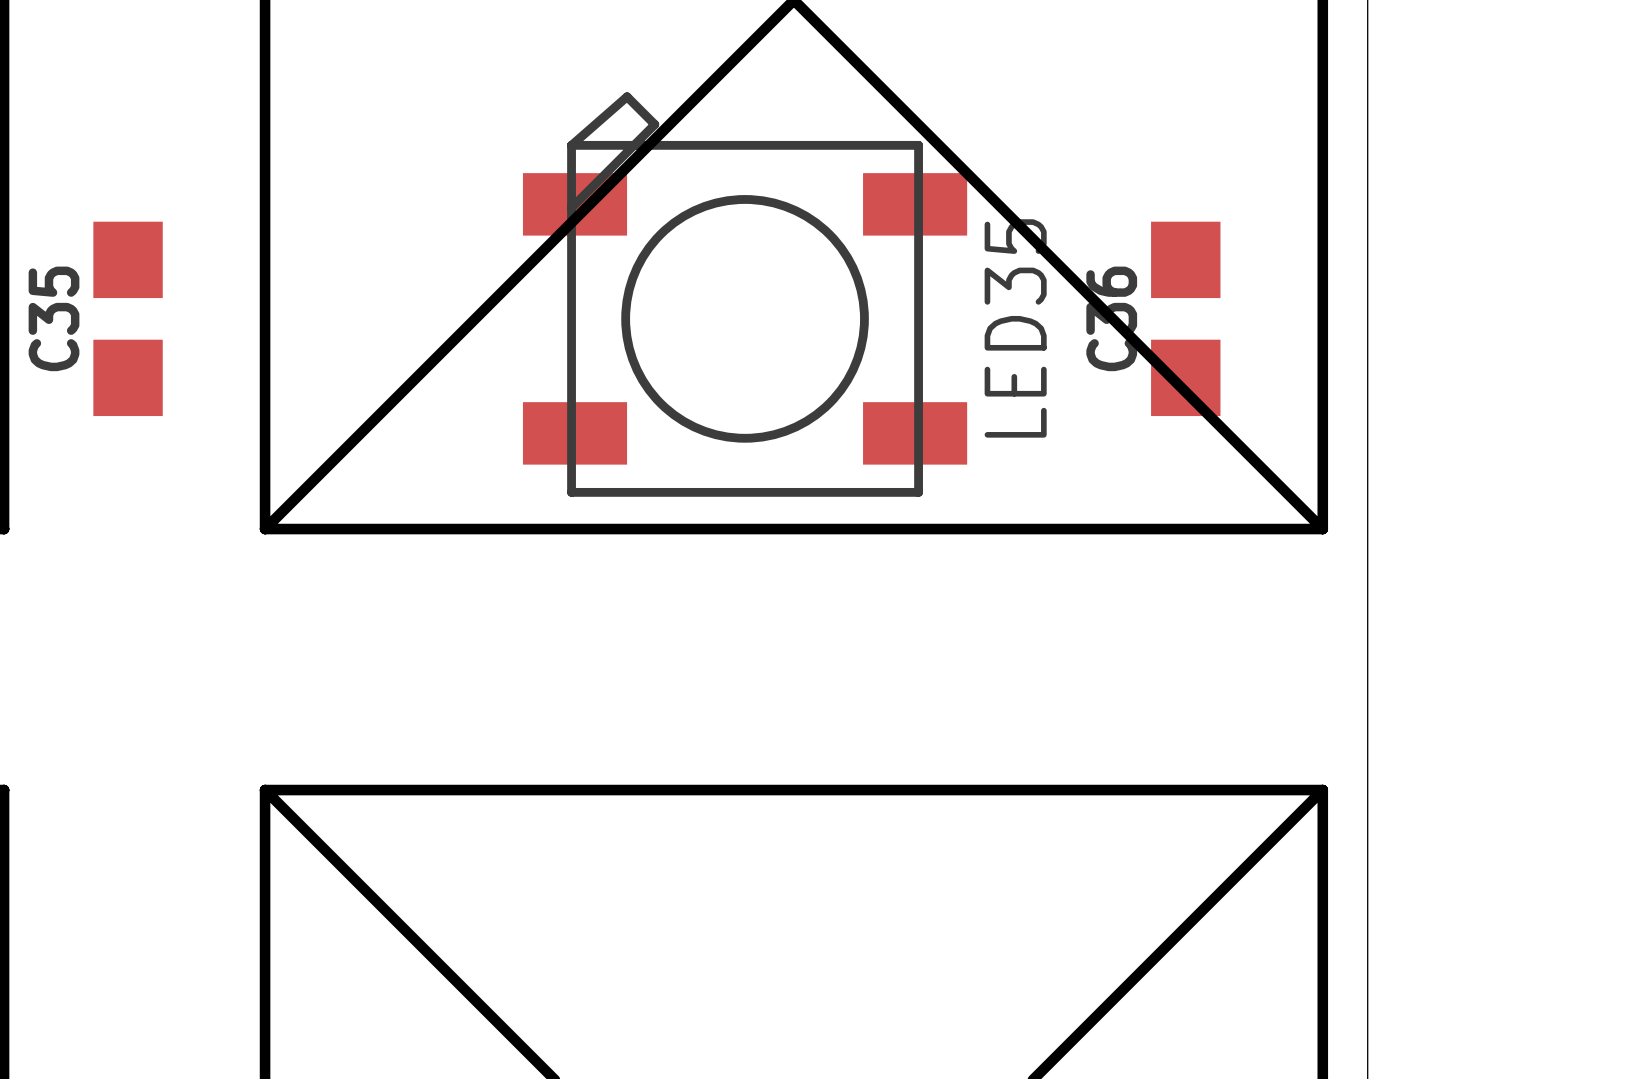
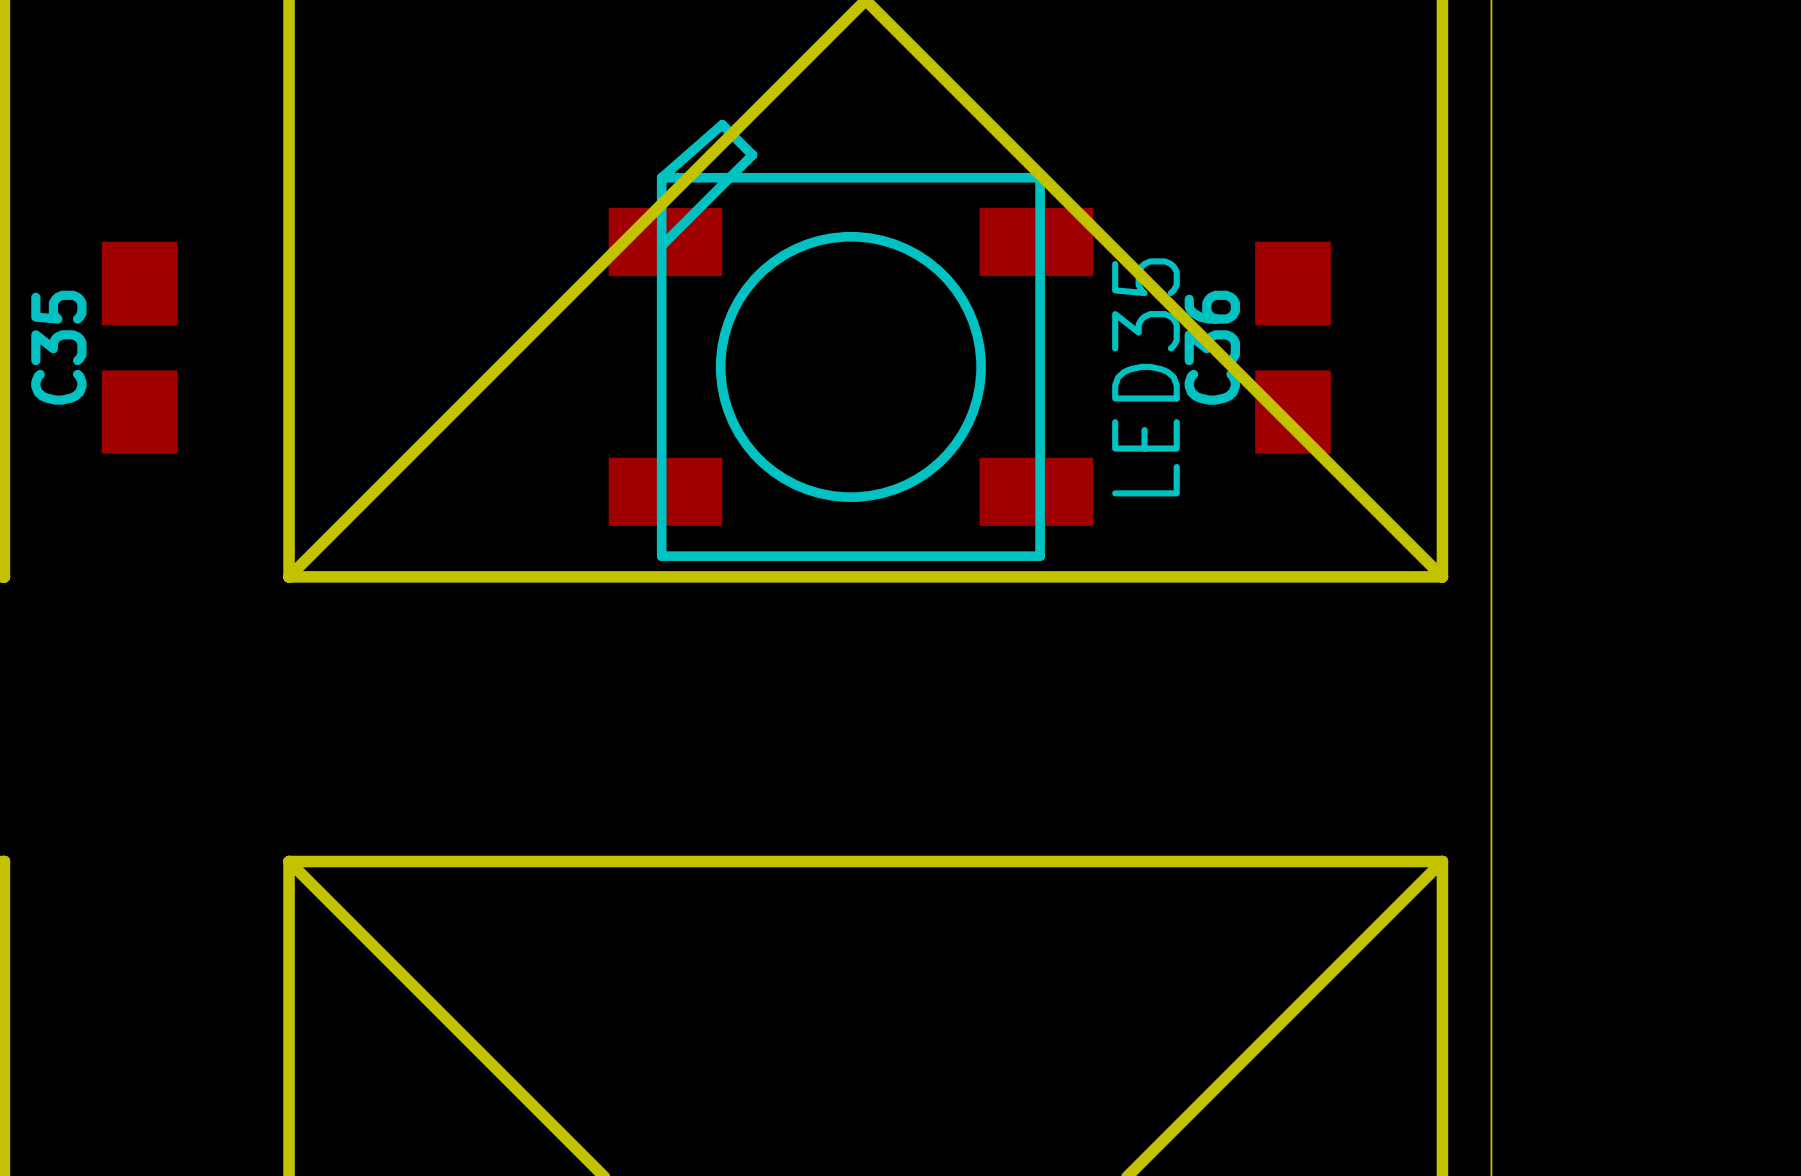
LED35 position: (745, 294) -> (850, 340)

